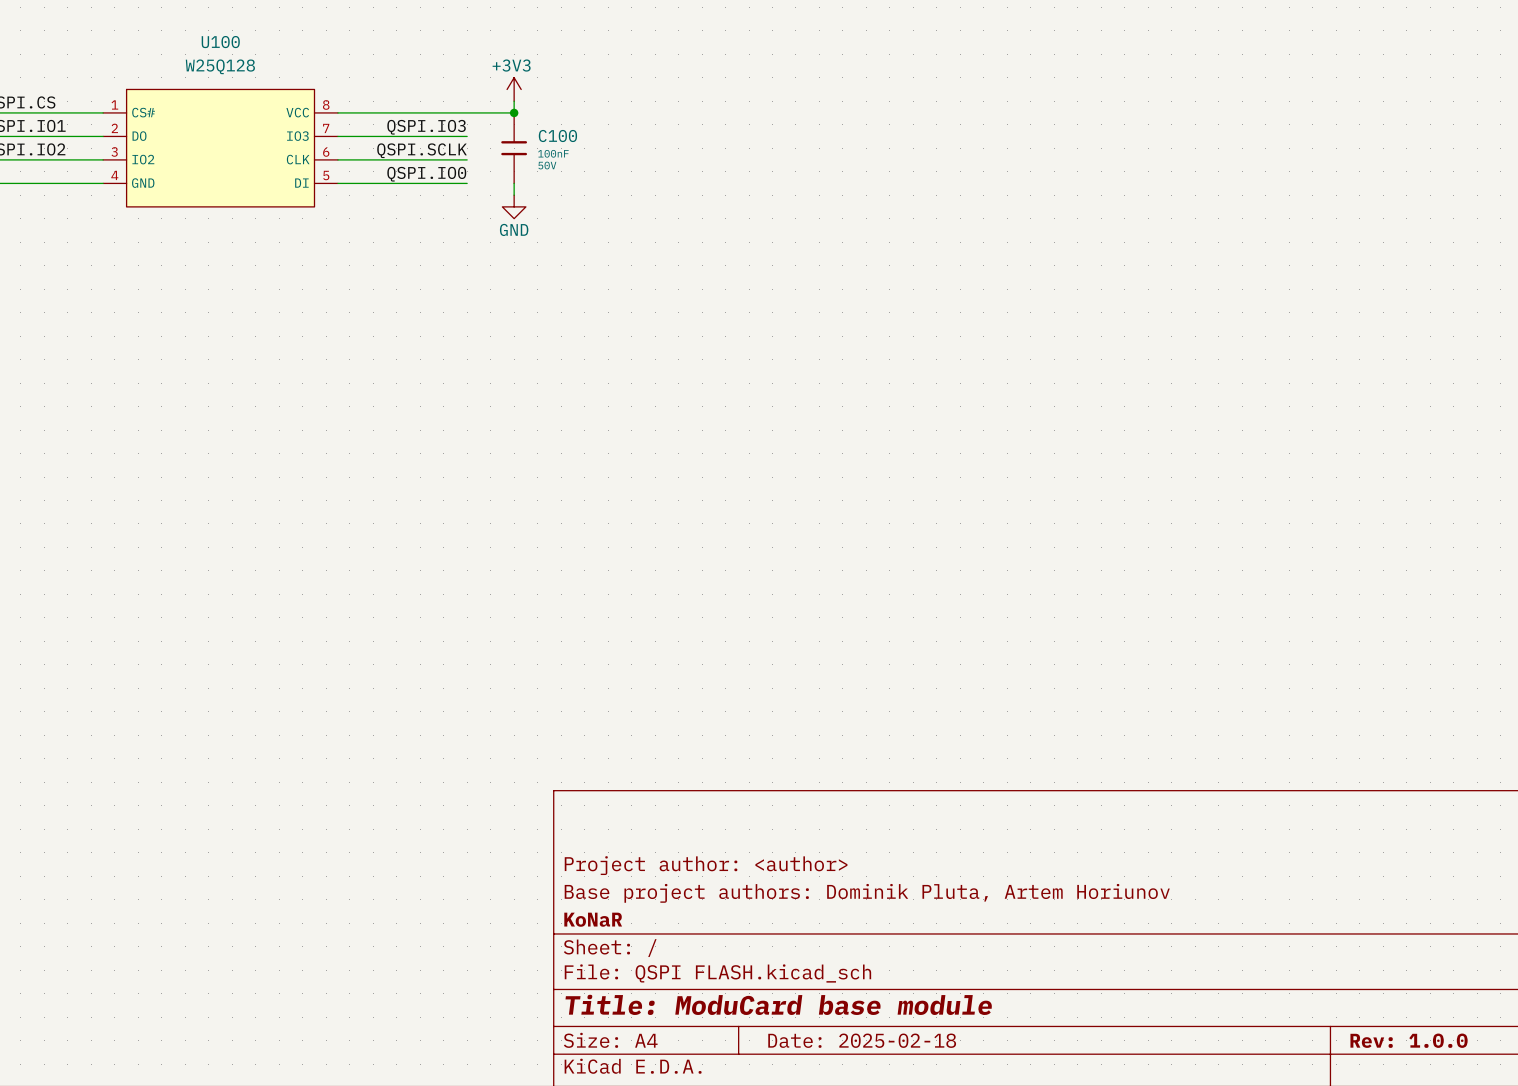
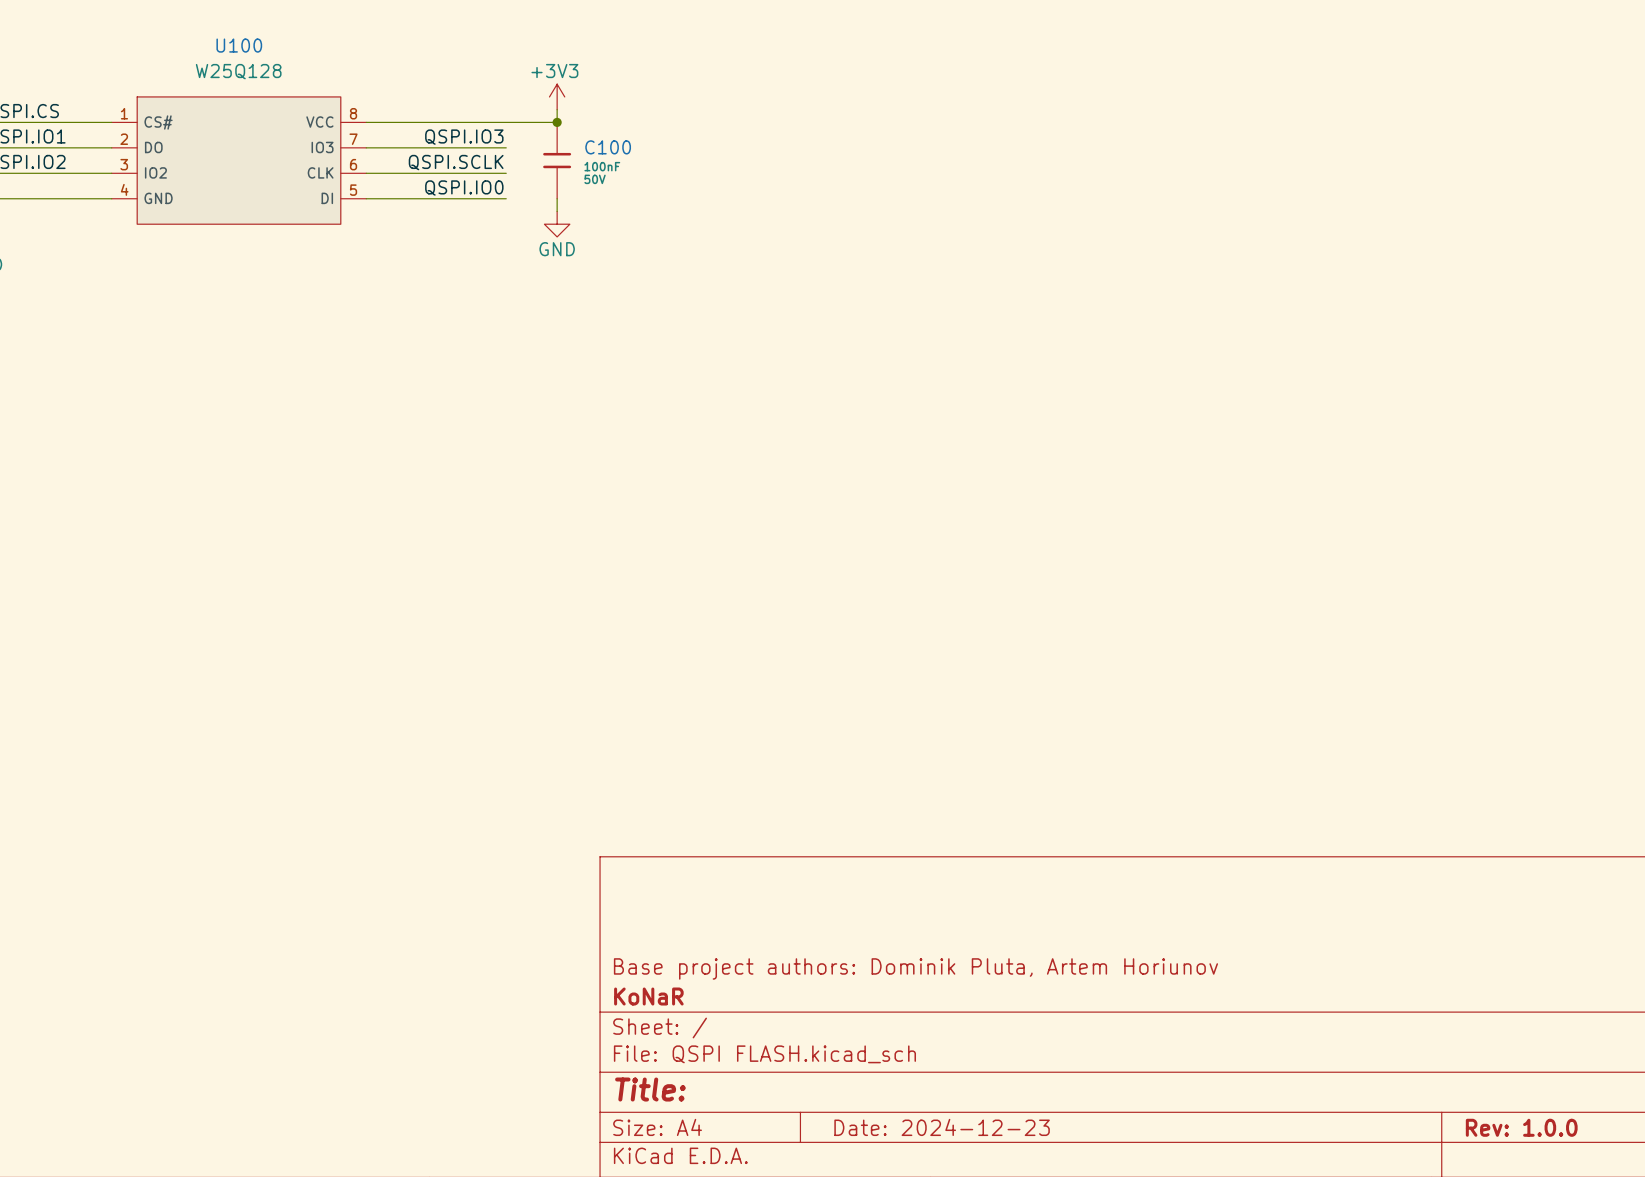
title block: Project author: <author> (706, 865) -> none
title block: Title: ModuCard base module (778, 1004) -> Title: (650, 1089)
title block: Date: 2025-02-18 (862, 1040) -> Date: 2024-12-23 (942, 1127)

